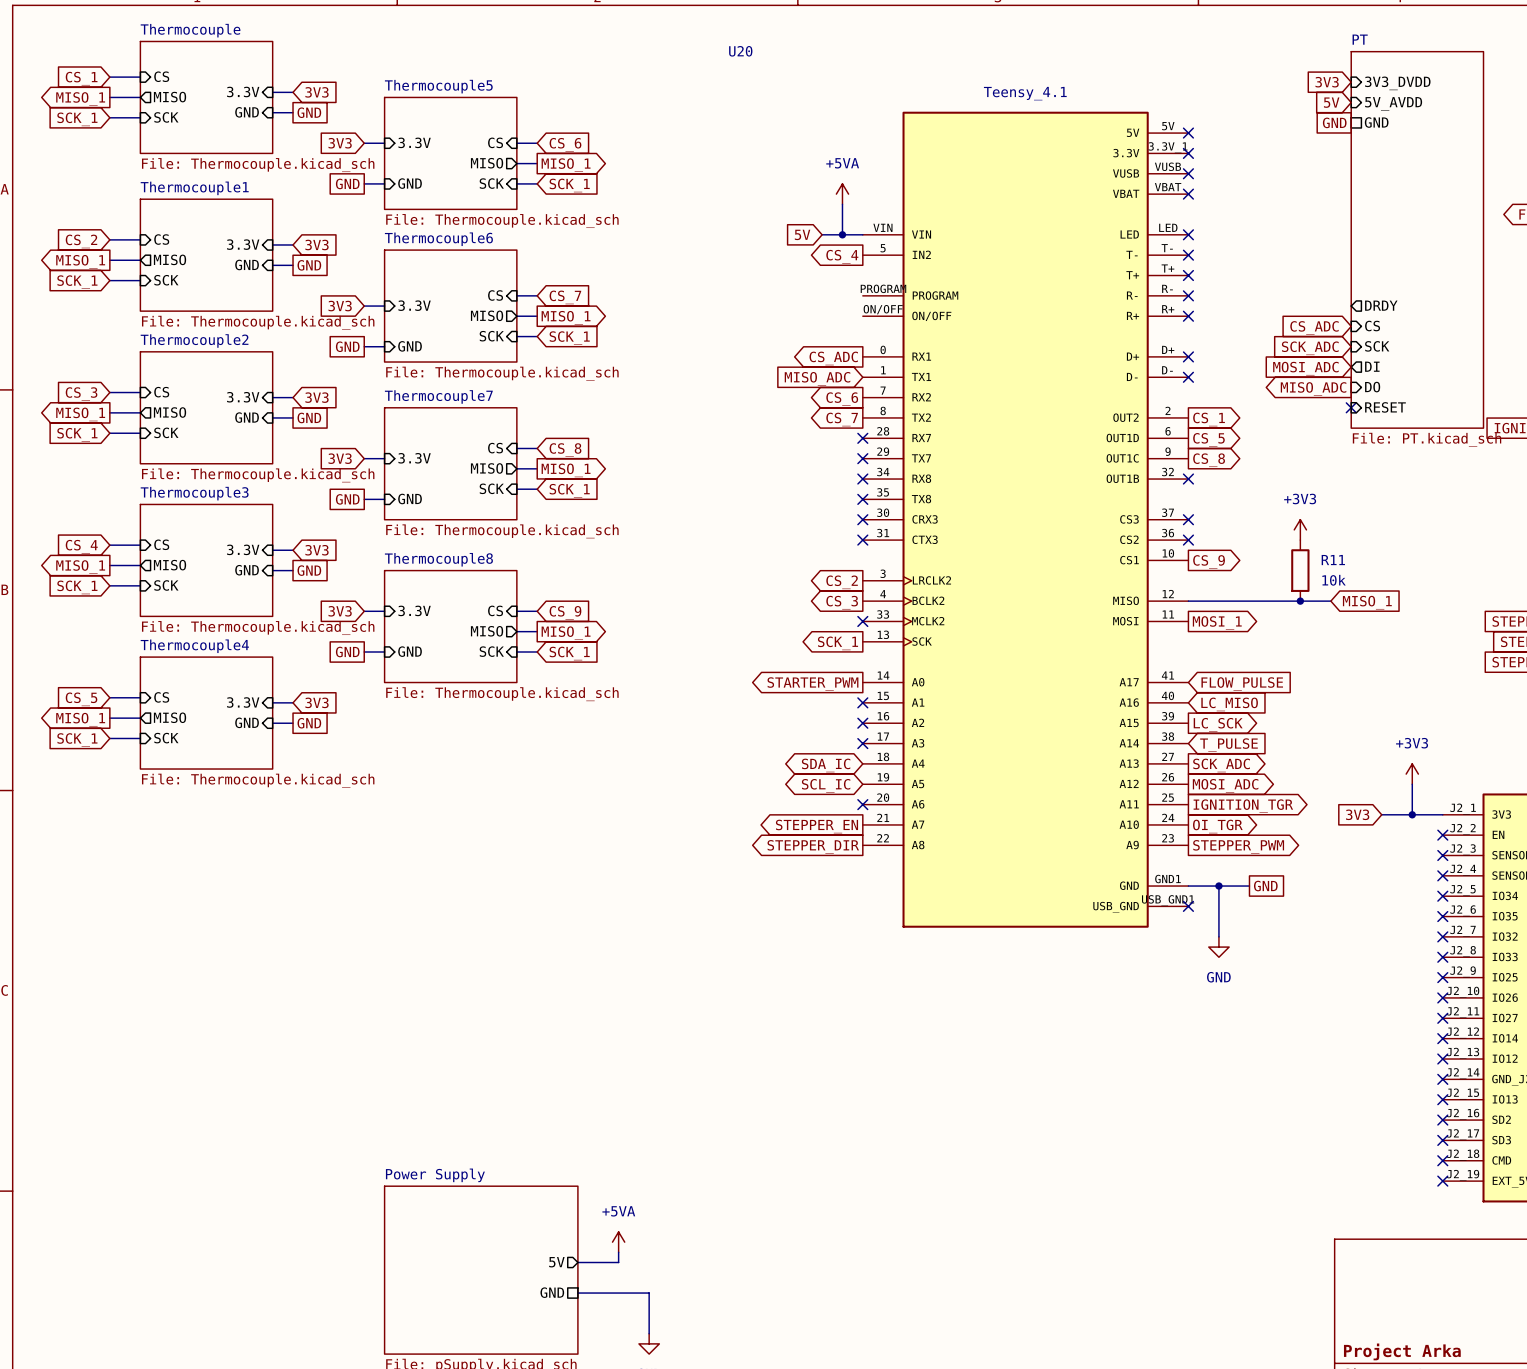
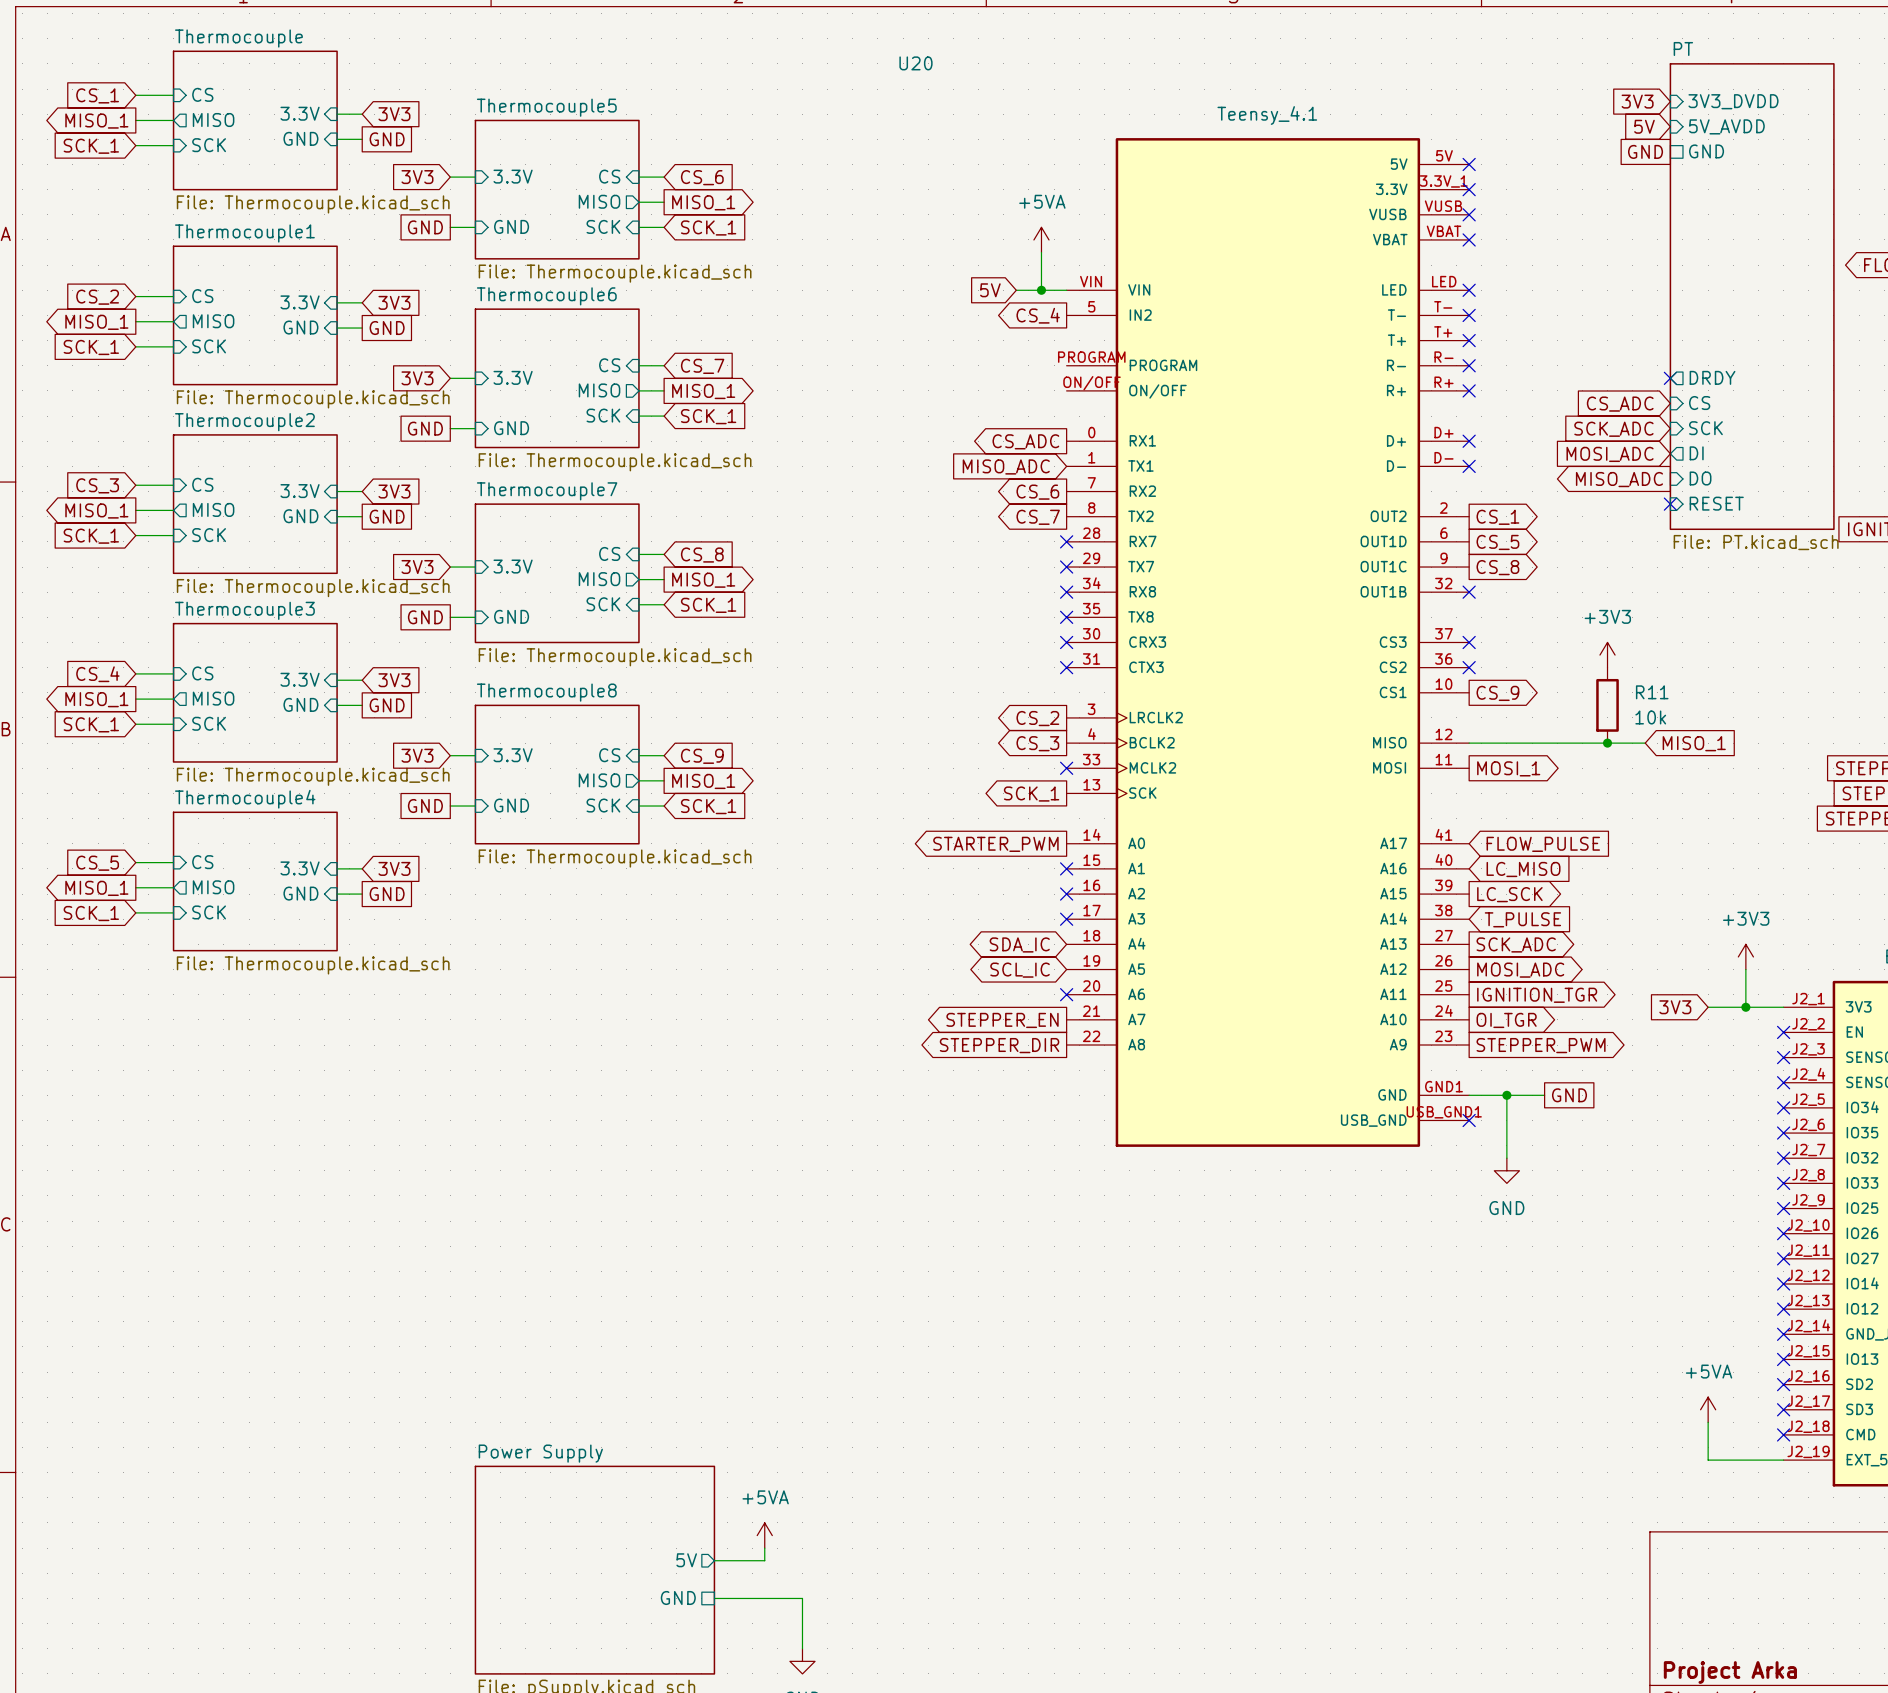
no-connect mark: none -> (1670, 378)
power symbol: none -> +5VA (1708, 1409)
wire: none -> (1708, 1422) (1708, 1460) (1783, 1460)
no-connect mark: (1442, 1181) -> none

